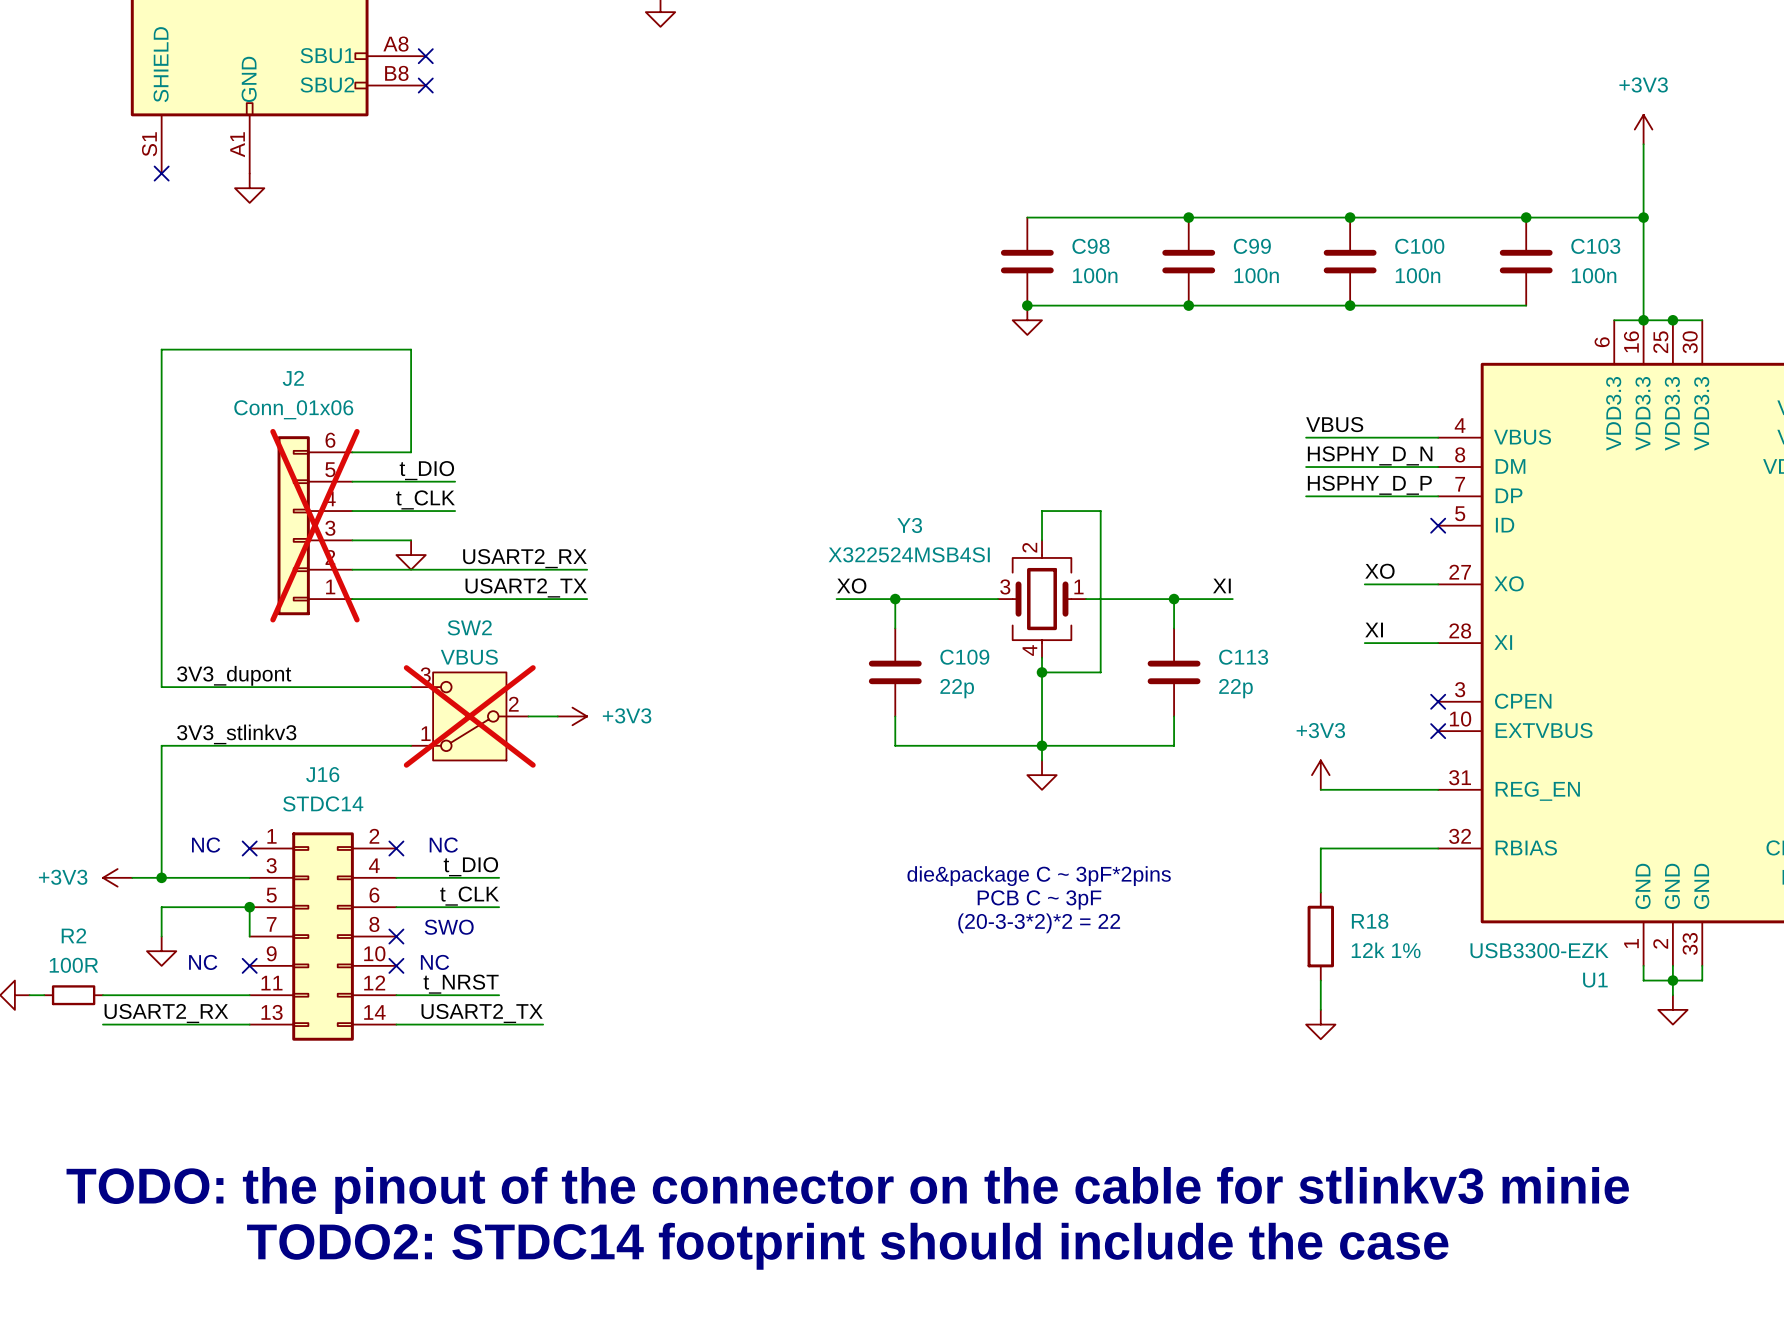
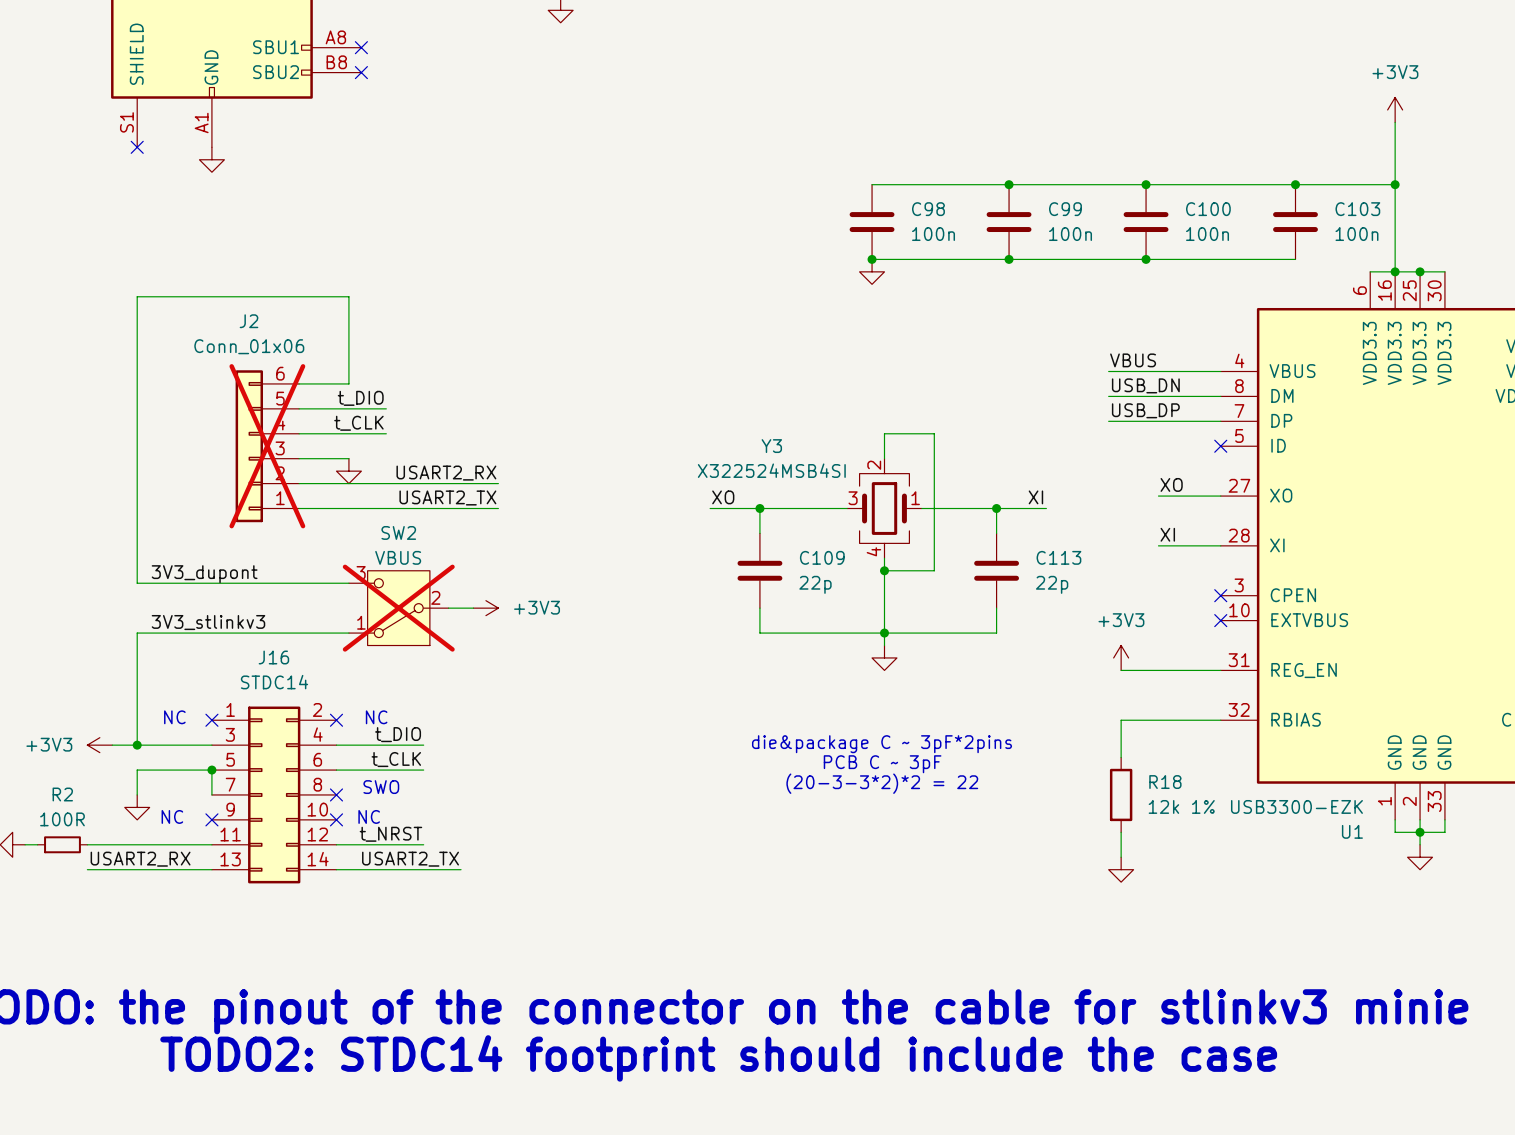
label: HSPHY_D_N (1370, 455) -> USB_DN (1145, 385)
label: HSPHY_D_P (1369, 485) -> USB_DP (1145, 410)

